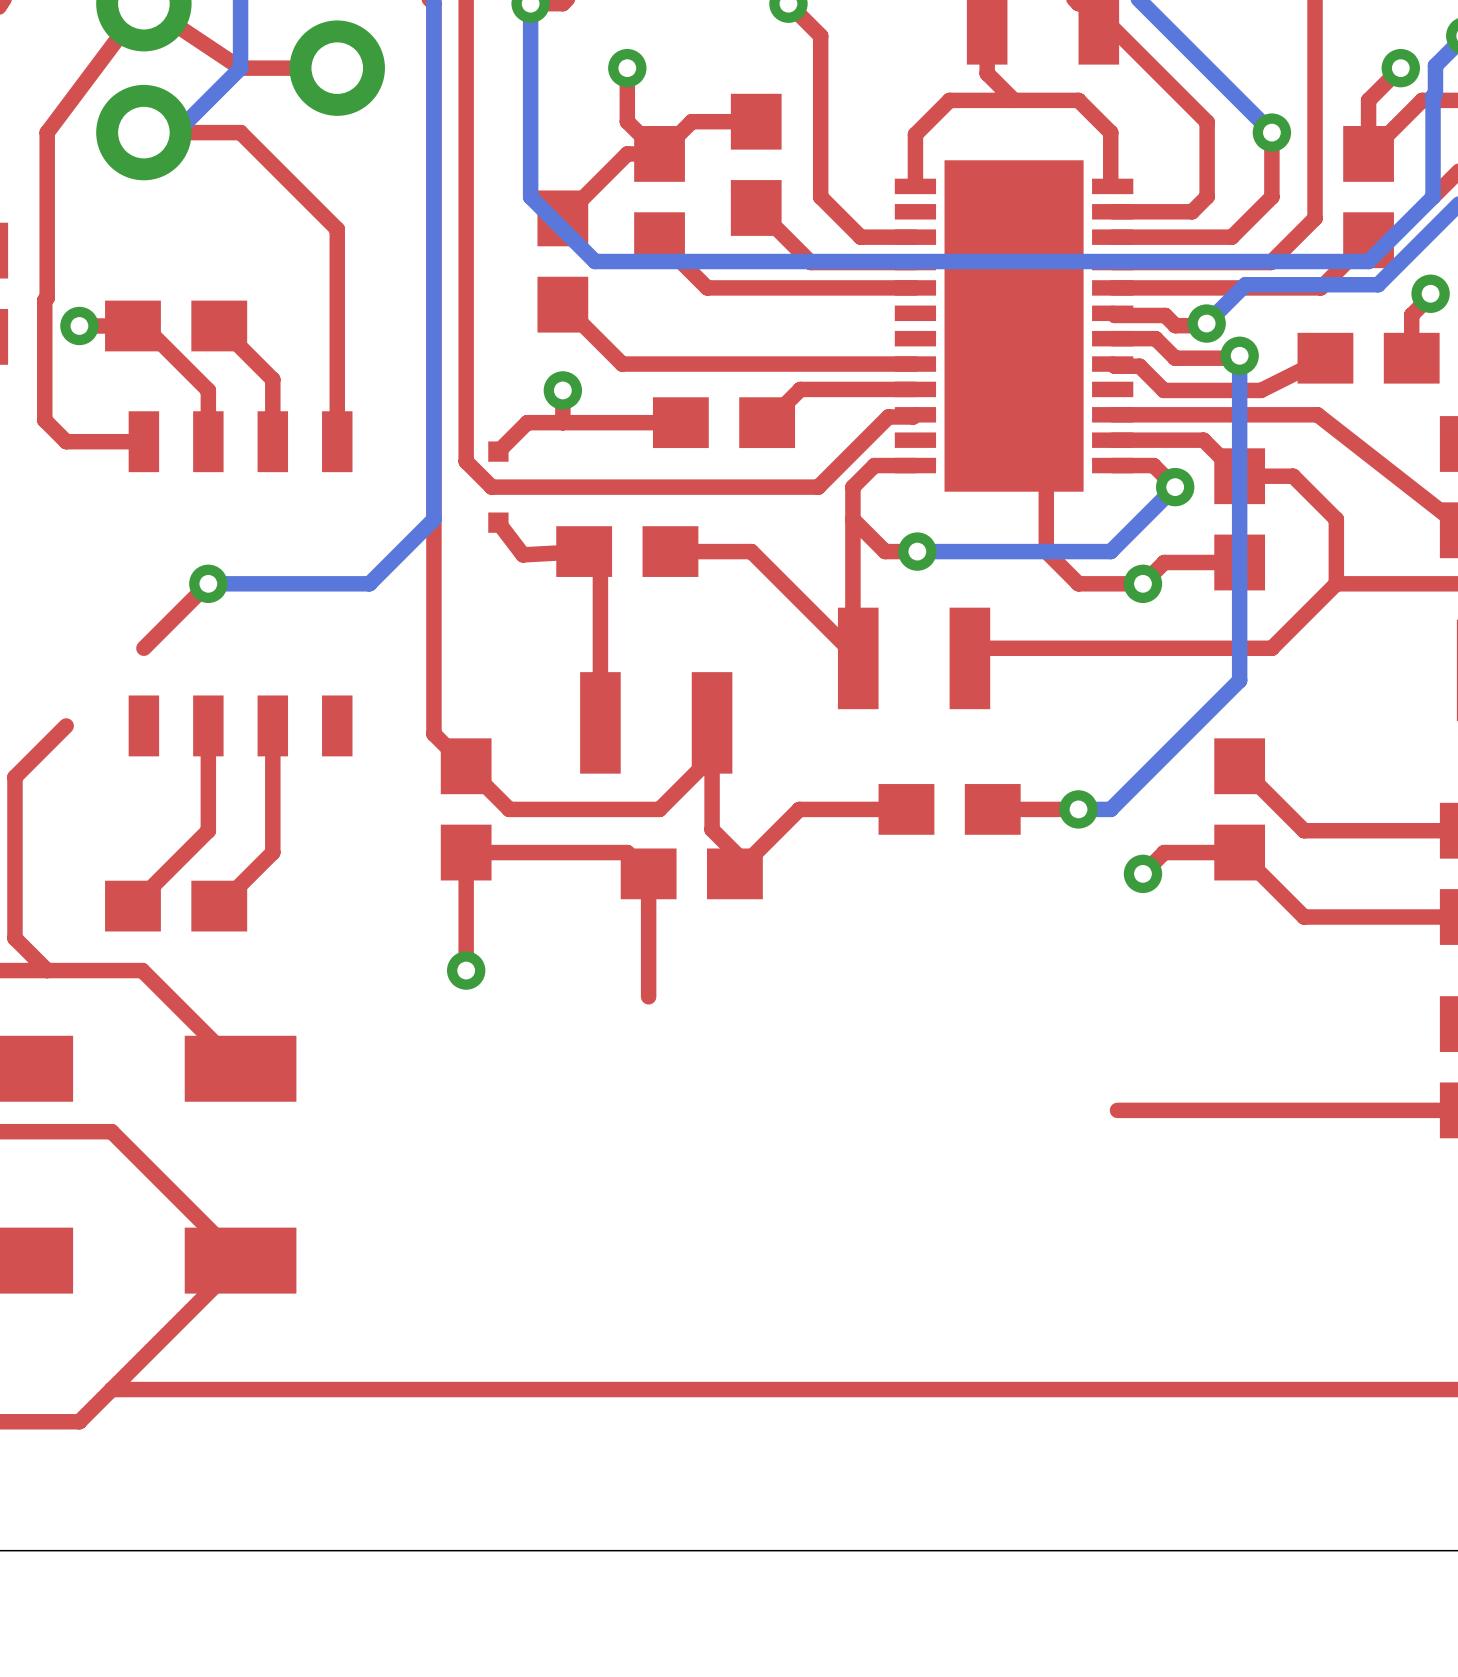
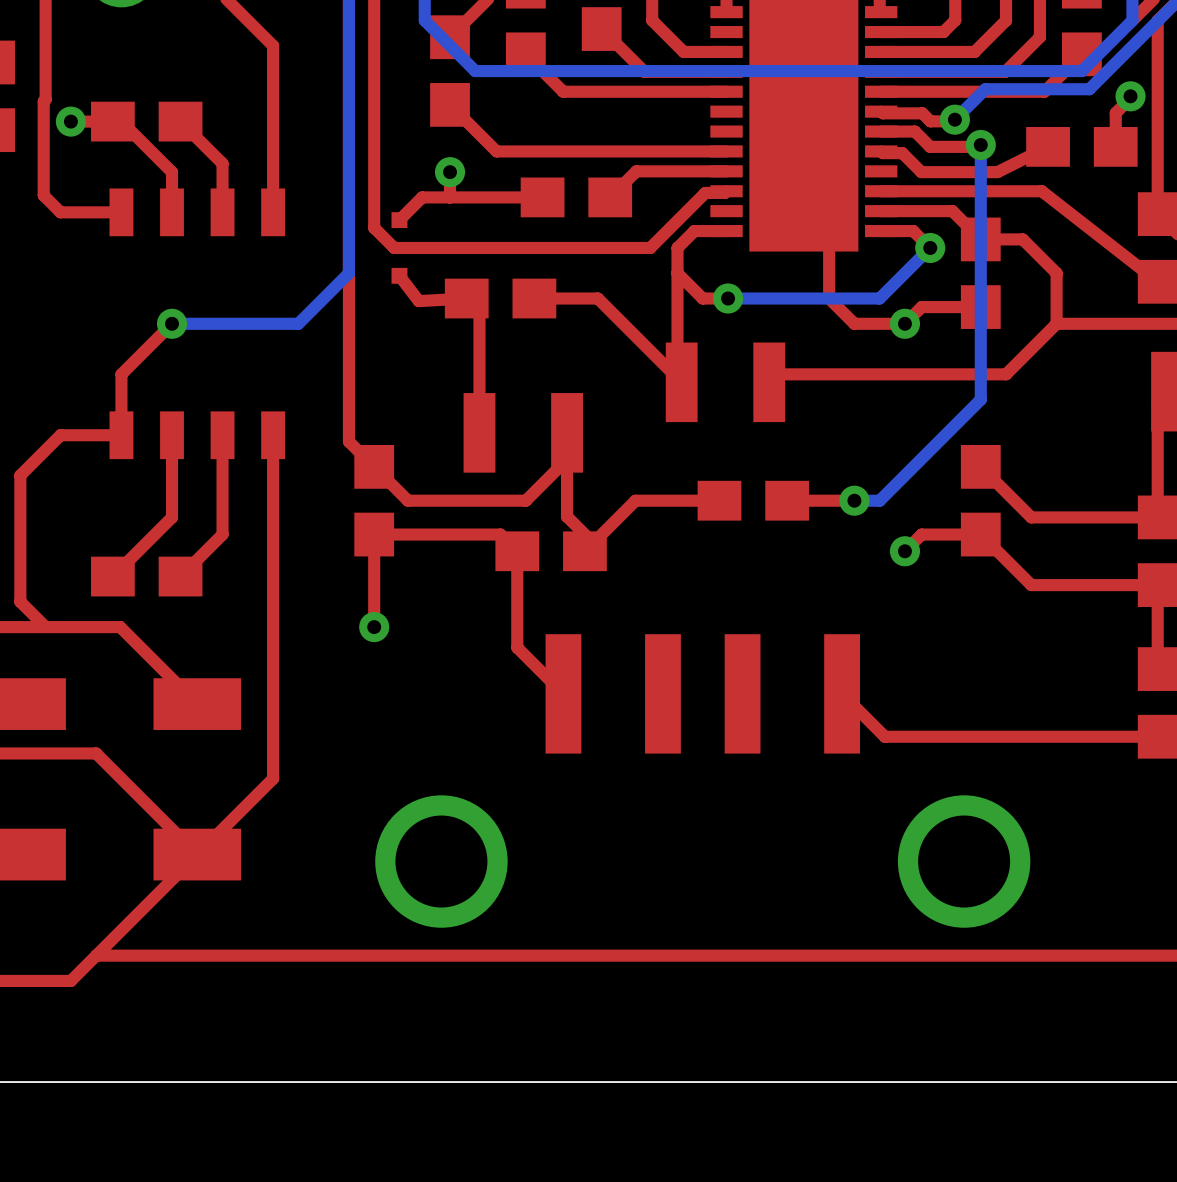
top track: none -> (121, 374) (121, 435) (60, 435)
top track: none -> (273, 435) (273, 778) (197, 854)
top track: none -> (517, 647) (563, 693)
top track: none -> (842, 693) (884, 736)
part: none -> (702, 780)

